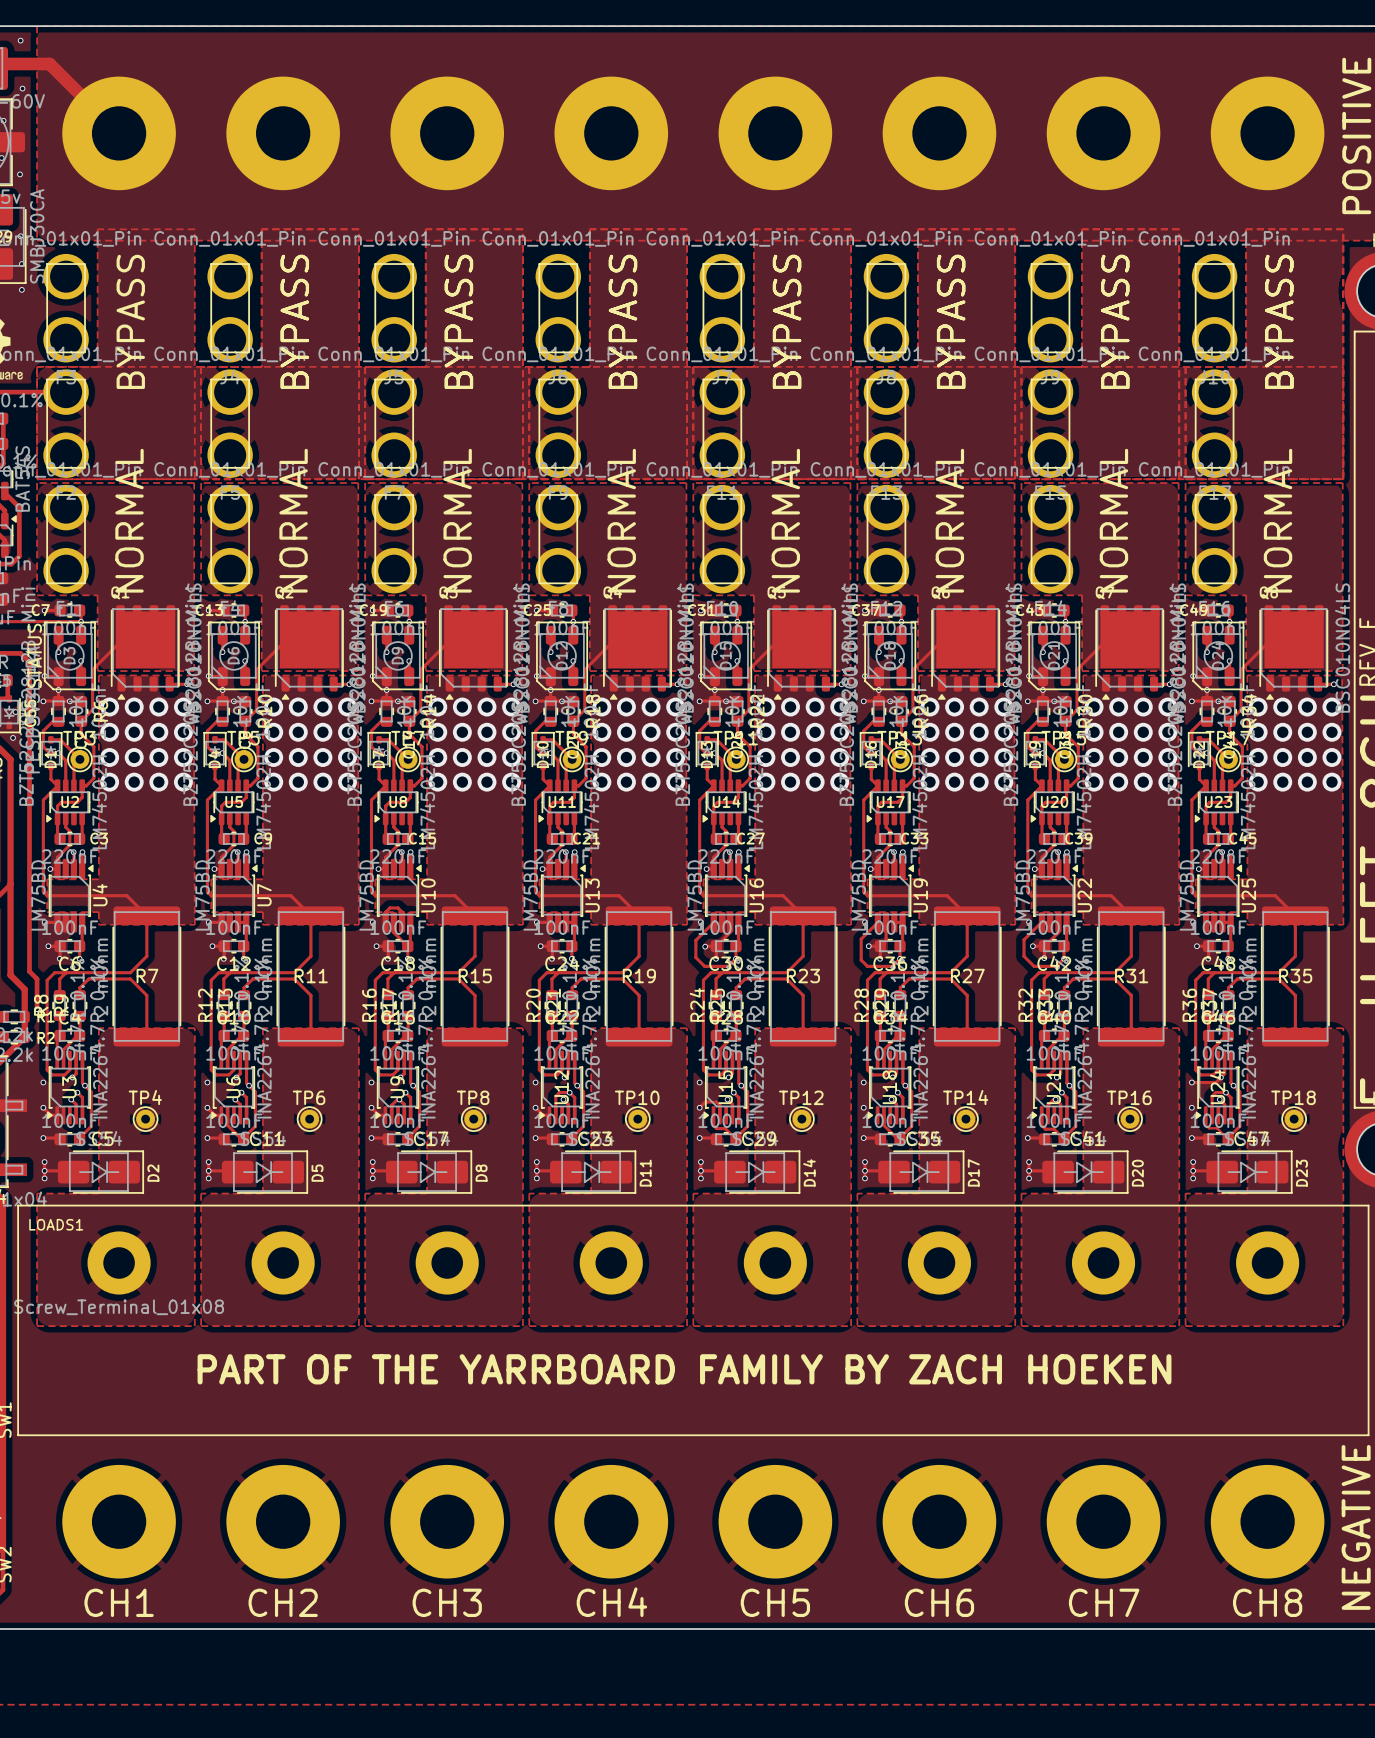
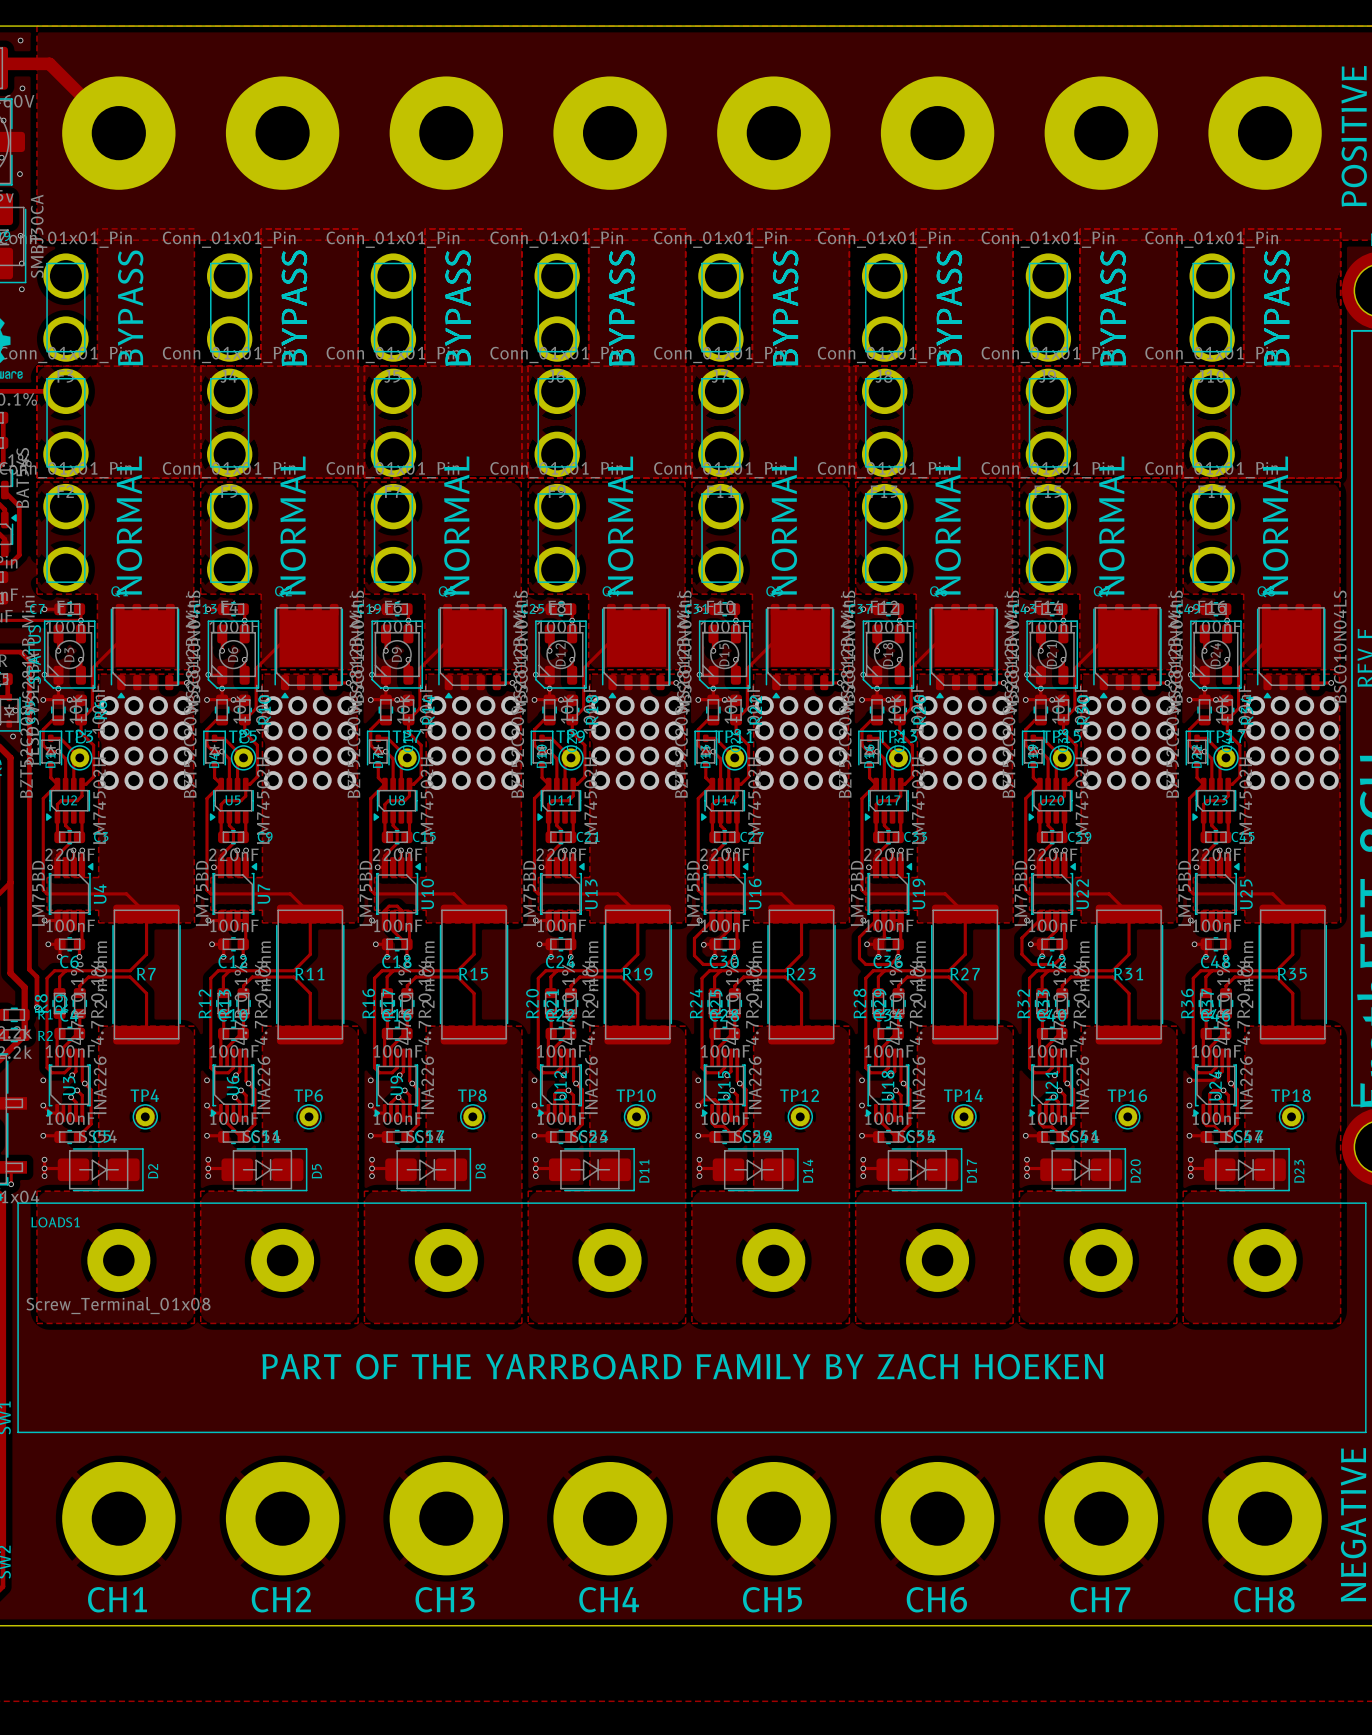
track: none -> (11, 1167) (11, 1184)
via: none -> (11, 1184)

